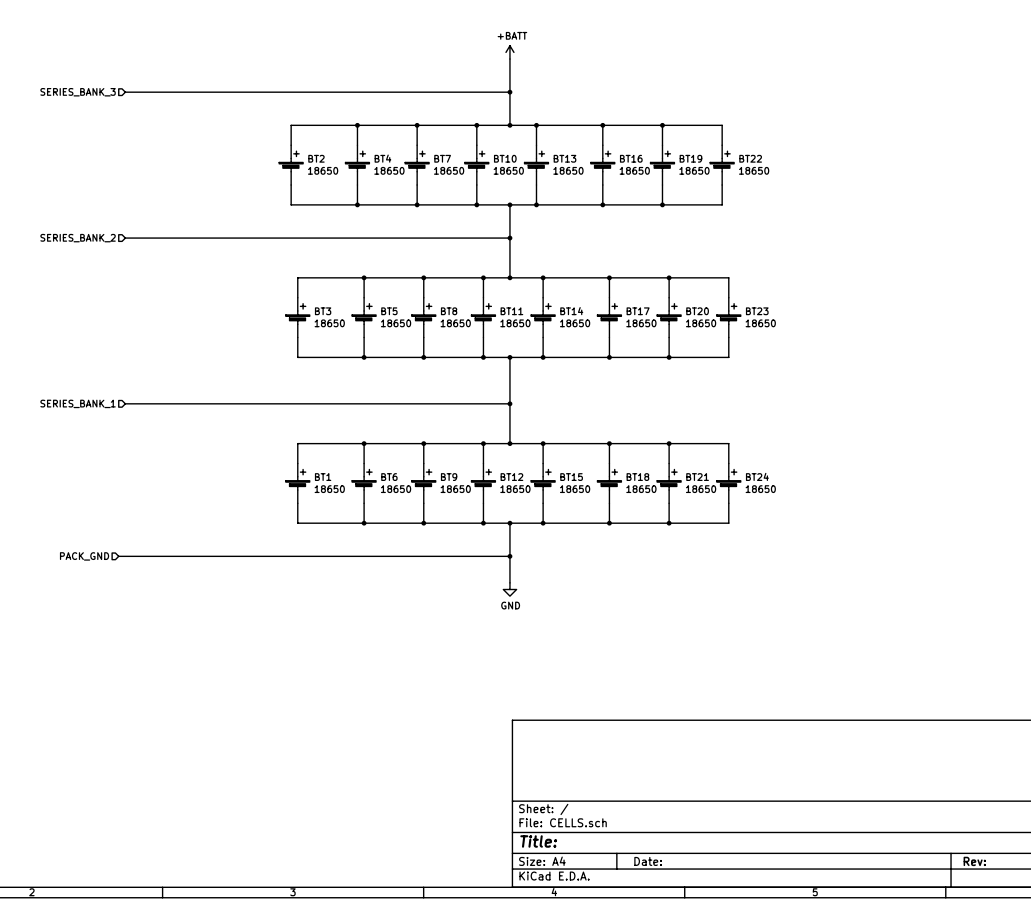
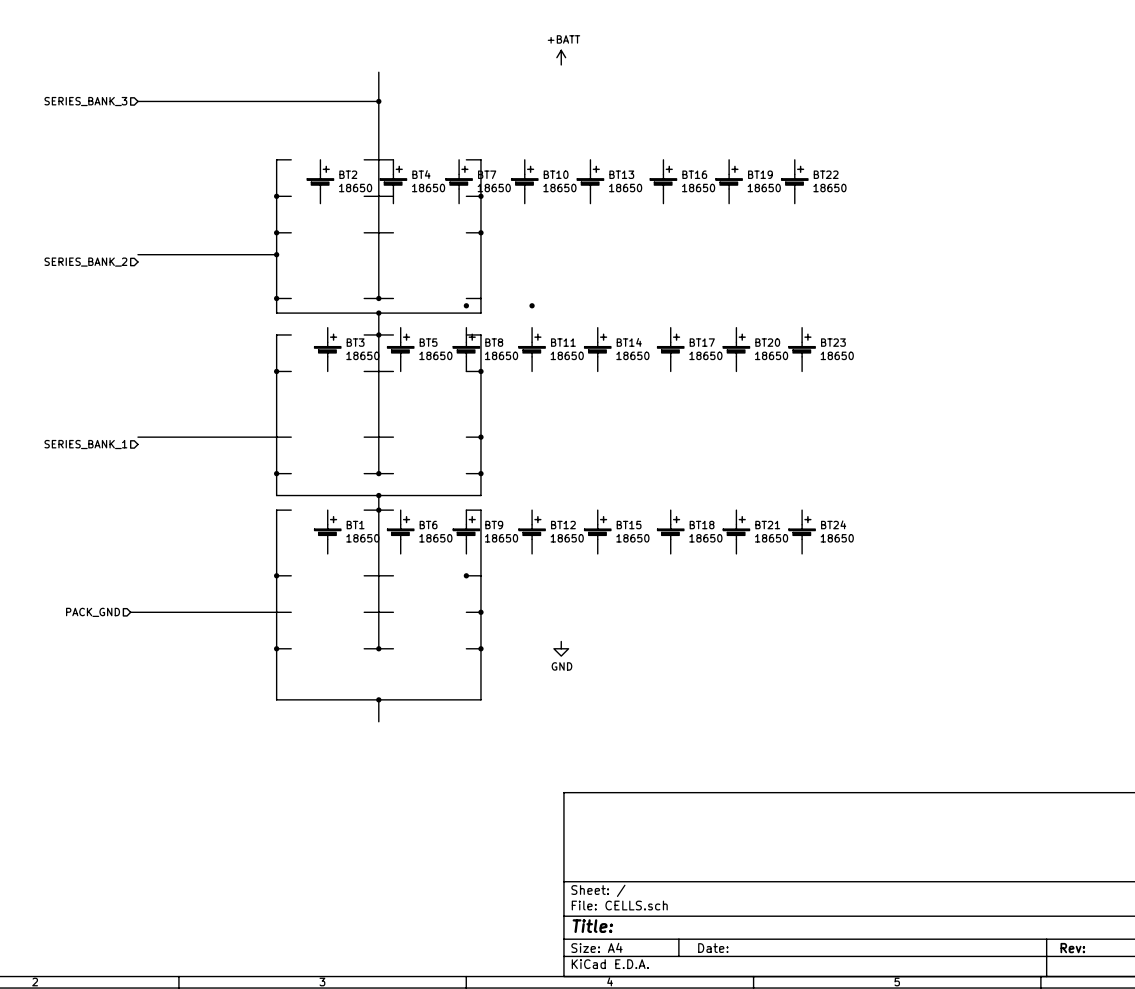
wire: (509, 59) (509, 125) -> none
wire: none -> (378, 72) (378, 298)
wire: (344, 92) (509, 92) -> none
junction: none -> (378, 101)
junction: (509, 92) -> none
wire: (357, 125) (357, 145) -> (364, 159) (393, 159)
junction: (357, 125) -> none
wire: (417, 125) (417, 145) -> none
junction: (417, 125) -> none
wire: (476, 125) (476, 145) -> none
junction: (476, 125) -> none
junction: (509, 125) -> none
wire: (536, 125) (536, 145) -> none
junction: (536, 125) -> none
wire: (602, 125) (602, 145) -> none
junction: (602, 125) -> none
wire: (662, 125) (662, 145) -> none
junction: (662, 125) -> none
wire: none -> (291, 159) (276, 159) (276, 313) (480, 313) (480, 159) (466, 159)
wire: (291, 145) (291, 125) (722, 125) (722, 145) -> none
wire: none -> (276, 196) (291, 196)
junction: none -> (276, 196)
wire: none -> (364, 196) (393, 196)
wire: none -> (466, 196) (480, 196)
junction: none -> (480, 196)
wire: (291, 185) (291, 204) (722, 204) (722, 185) -> none
wire: (357, 185) (357, 204) -> none
wire: (417, 185) (417, 204) -> none
wire: (476, 185) (476, 204) -> none
wire: (536, 185) (536, 204) -> none
wire: (602, 185) (602, 204) -> none
wire: (662, 185) (662, 204) -> none
junction: (357, 204) -> none
junction: (417, 204) -> none
junction: (476, 204) -> none
wire: (509, 204) (509, 277) -> none
junction: (509, 204) -> none
junction: (536, 204) -> none
junction: (602, 204) -> none
junction: (662, 204) -> none
wire: none -> (276, 232) (291, 232)
junction: none -> (276, 232)
wire: none -> (364, 232) (393, 232)
wire: none -> (466, 232) (480, 232)
junction: none -> (480, 232)
wire: none -> (137, 254) (276, 254)
junction: none -> (276, 254)
wire: (125, 238) (509, 238) -> none
junction: (509, 238) -> none
wire: none -> (276, 298) (291, 298)
junction: none -> (276, 298)
wire: none -> (364, 298) (393, 298)
junction: none -> (378, 298)
wire: none -> (466, 298) (480, 298)
wire: (364, 277) (364, 297) -> none
junction: (364, 277) -> none
wire: (423, 277) (423, 297) -> none
wire: (483, 277) (483, 297) -> none
junction: (509, 277) -> none
wire: (543, 277) (543, 297) -> none
junction: (543, 277) -> none
wire: (609, 277) (609, 297) -> none
junction: (609, 277) -> none
wire: (669, 277) (669, 297) -> none
junction: (669, 277) -> none
wire: none -> (378, 313) (378, 473)
junction: none -> (378, 313)
wire: (297, 297) (297, 277) (728, 277) (728, 297) -> none
wire: none -> (291, 334) (276, 334) (276, 495) (480, 495) (480, 334) (466, 334)
wire: none -> (364, 334) (393, 334)
junction: none -> (378, 334)
wire: none -> (276, 371) (291, 371)
junction: none -> (276, 371)
wire: (297, 337) (297, 357) (728, 357) (728, 337) -> none
wire: none -> (364, 371) (393, 371)
wire: (364, 337) (364, 357) -> none
wire: (423, 337) (423, 357) -> (466, 371) (480, 371)
junction: none -> (480, 371)
wire: (483, 337) (483, 357) -> none
wire: (543, 337) (543, 357) -> none
wire: (609, 337) (609, 357) -> none
wire: (669, 337) (669, 357) -> none
junction: (364, 357) -> none
junction: (423, 357) -> none
junction: (483, 357) -> none
wire: (509, 357) (509, 443) -> none
junction: (509, 357) -> none
junction: (543, 357) -> none
junction: (609, 357) -> none
junction: (669, 357) -> none
wire: none -> (137, 437) (291, 437)
wire: none -> (364, 437) (393, 437)
wire: none -> (466, 437) (480, 437)
junction: none -> (480, 437)
wire: (125, 403) (509, 403) -> none
junction: (509, 403) -> none
wire: none -> (276, 473) (291, 473)
junction: none -> (276, 473)
wire: none -> (364, 473) (393, 473)
junction: none -> (378, 473)
wire: none -> (466, 473) (480, 473)
wire: (364, 443) (364, 463) -> none
junction: (364, 443) -> none
wire: (423, 443) (423, 463) -> (291, 510) (276, 510) (276, 699) (480, 699) (480, 510) (466, 510)
junction position: (423, 443) -> (480, 473)
wire: (483, 443) (483, 463) -> none
junction: (483, 443) -> none
junction: (509, 443) -> none
wire: (543, 443) (543, 463) -> none
junction: (543, 443) -> none
wire: (609, 443) (609, 463) -> none
junction: (609, 443) -> none
wire: (669, 443) (669, 463) -> none
junction: (669, 443) -> none
wire: none -> (378, 495) (378, 648)
junction: none -> (378, 495)
wire: (297, 463) (297, 443) (728, 443) (728, 463) -> none
wire: none -> (364, 510) (393, 510)
junction: none -> (378, 510)
wire: (297, 503) (297, 523) (330, 523) -> none
wire: (364, 503) (364, 523) -> none
wire: (423, 503) (423, 523) (357, 523) -> none
wire: (483, 503) (483, 523) -> none
wire: (543, 503) (543, 523) -> none
wire: (609, 503) (609, 523) -> none
wire: (669, 503) (669, 523) -> none
wire: (728, 503) (728, 523) (437, 523) -> none
wire: none -> (276, 575) (291, 575)
junction: none -> (276, 575)
junction: (364, 523) -> none
junction: (483, 523) -> none
wire: (509, 523) (509, 582) -> none
junction: (509, 523) -> none
junction: (543, 523) -> none
junction: (609, 523) -> none
junction: (669, 523) -> none
wire: (264, 556) (330, 556) -> none
wire: (357, 556) (423, 556) -> none
wire: (437, 556) (509, 556) -> none
junction: none -> (480, 612)
junction: (509, 556) -> none
wire: none -> (276, 648) (291, 648)
junction: none -> (276, 648)
wire: none -> (364, 648) (393, 648)
junction: none -> (378, 648)
wire: none -> (466, 648) (480, 648)
junction: none -> (480, 648)
wire: none -> (378, 699) (378, 721)
junction: none -> (378, 699)

